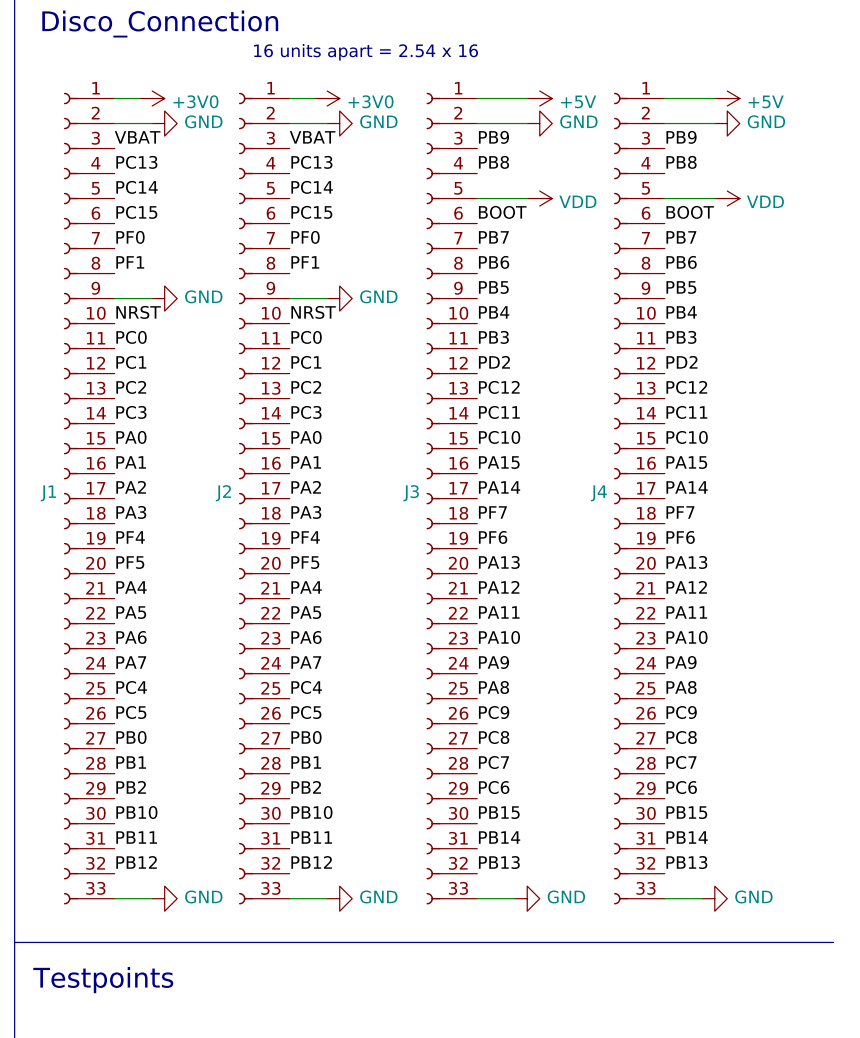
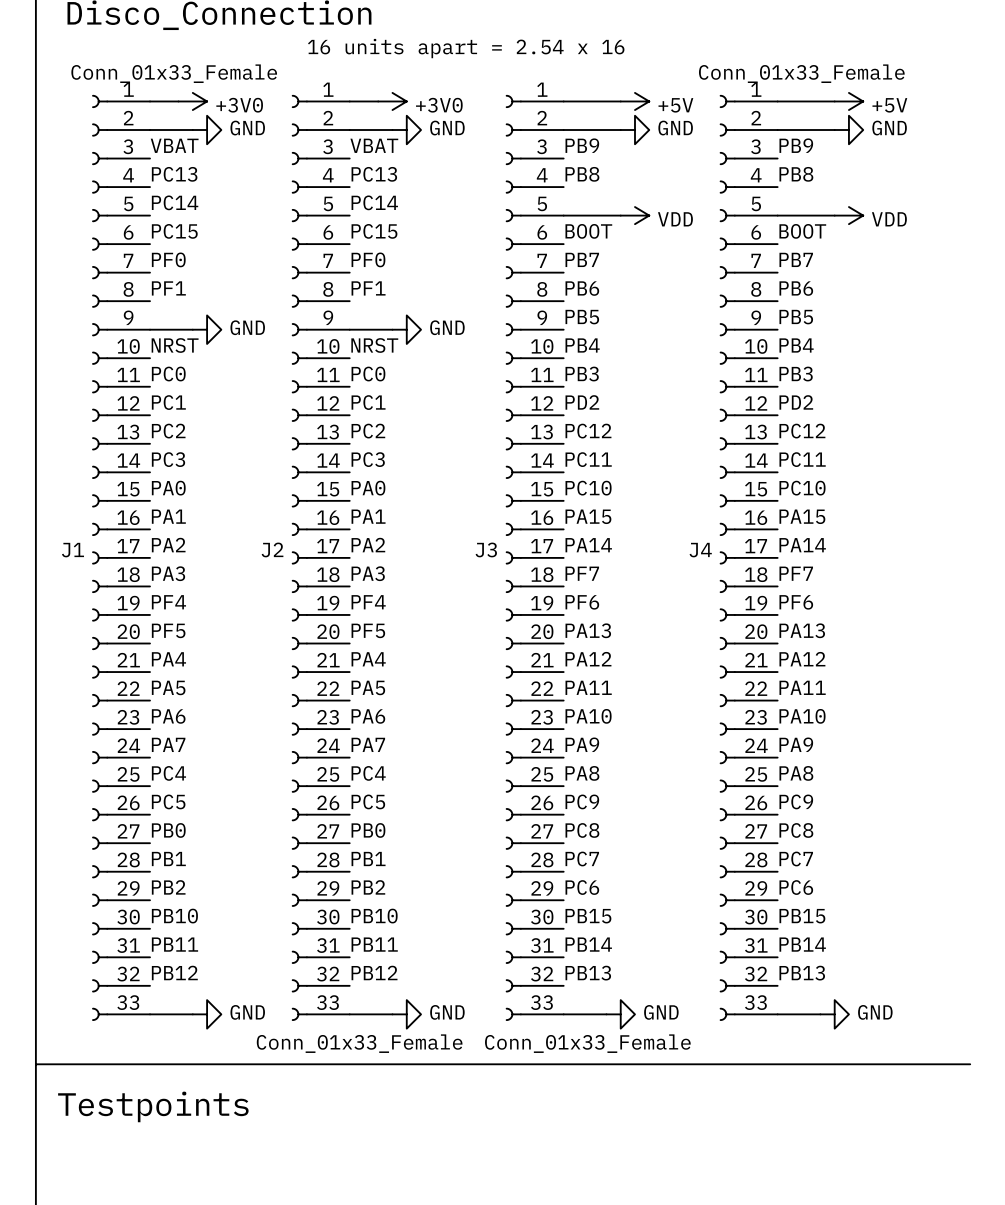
J1 value: none -> Conn_01x33_Female (174, 73)
J4 value: none -> Conn_01x33_Female (801, 73)
J2 value: none -> Conn_01x33_Female (359, 1043)
J3 value: none -> Conn_01x33_Female (587, 1043)

